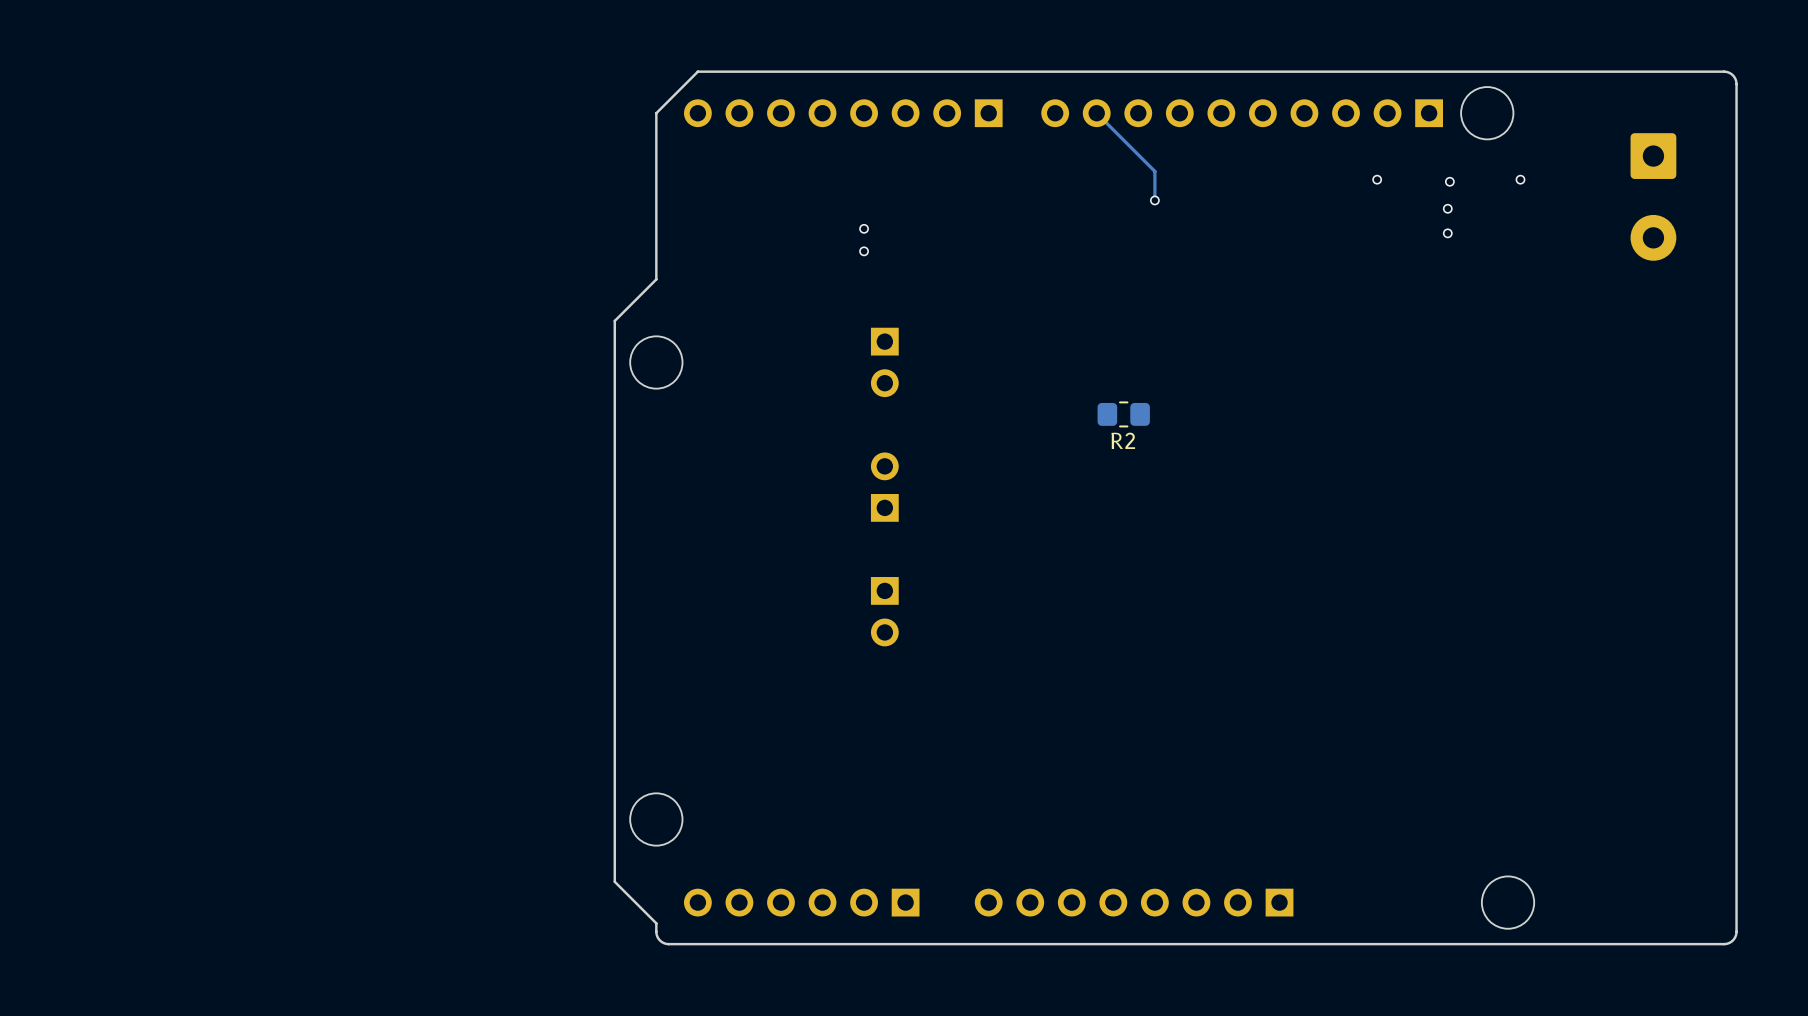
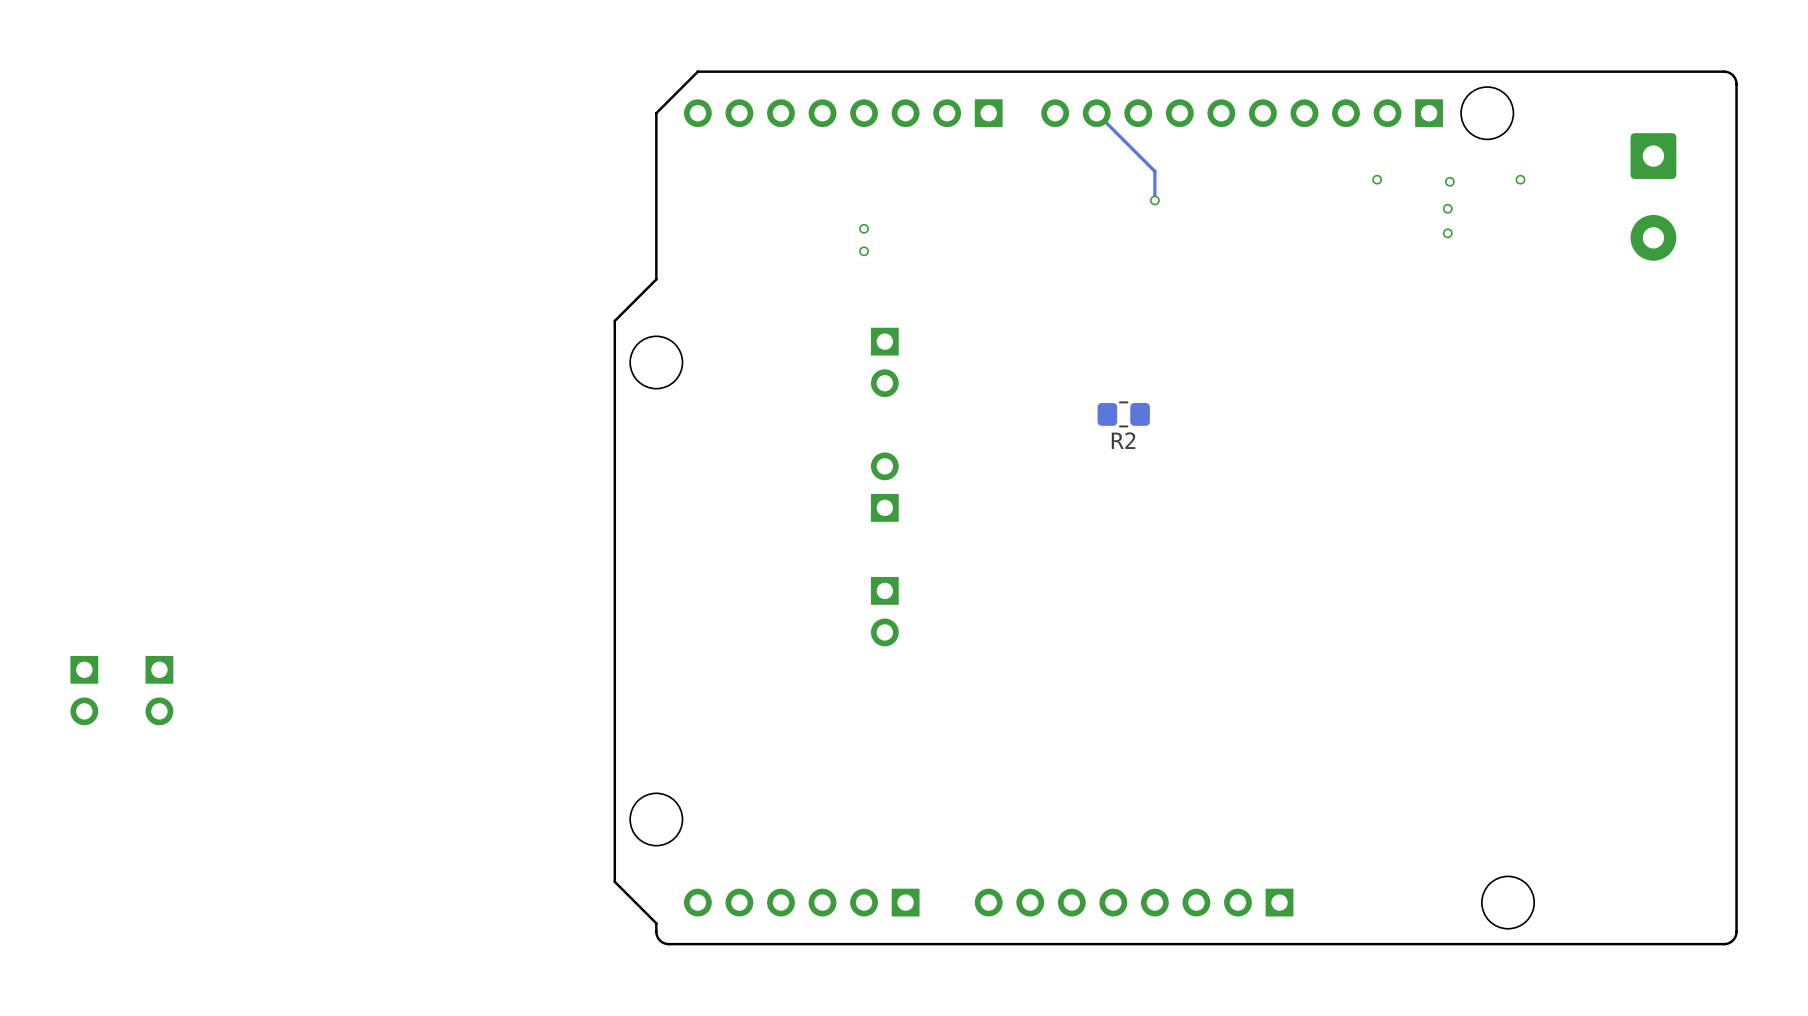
part: none -> (84, 690)
part: none -> (159, 690)

